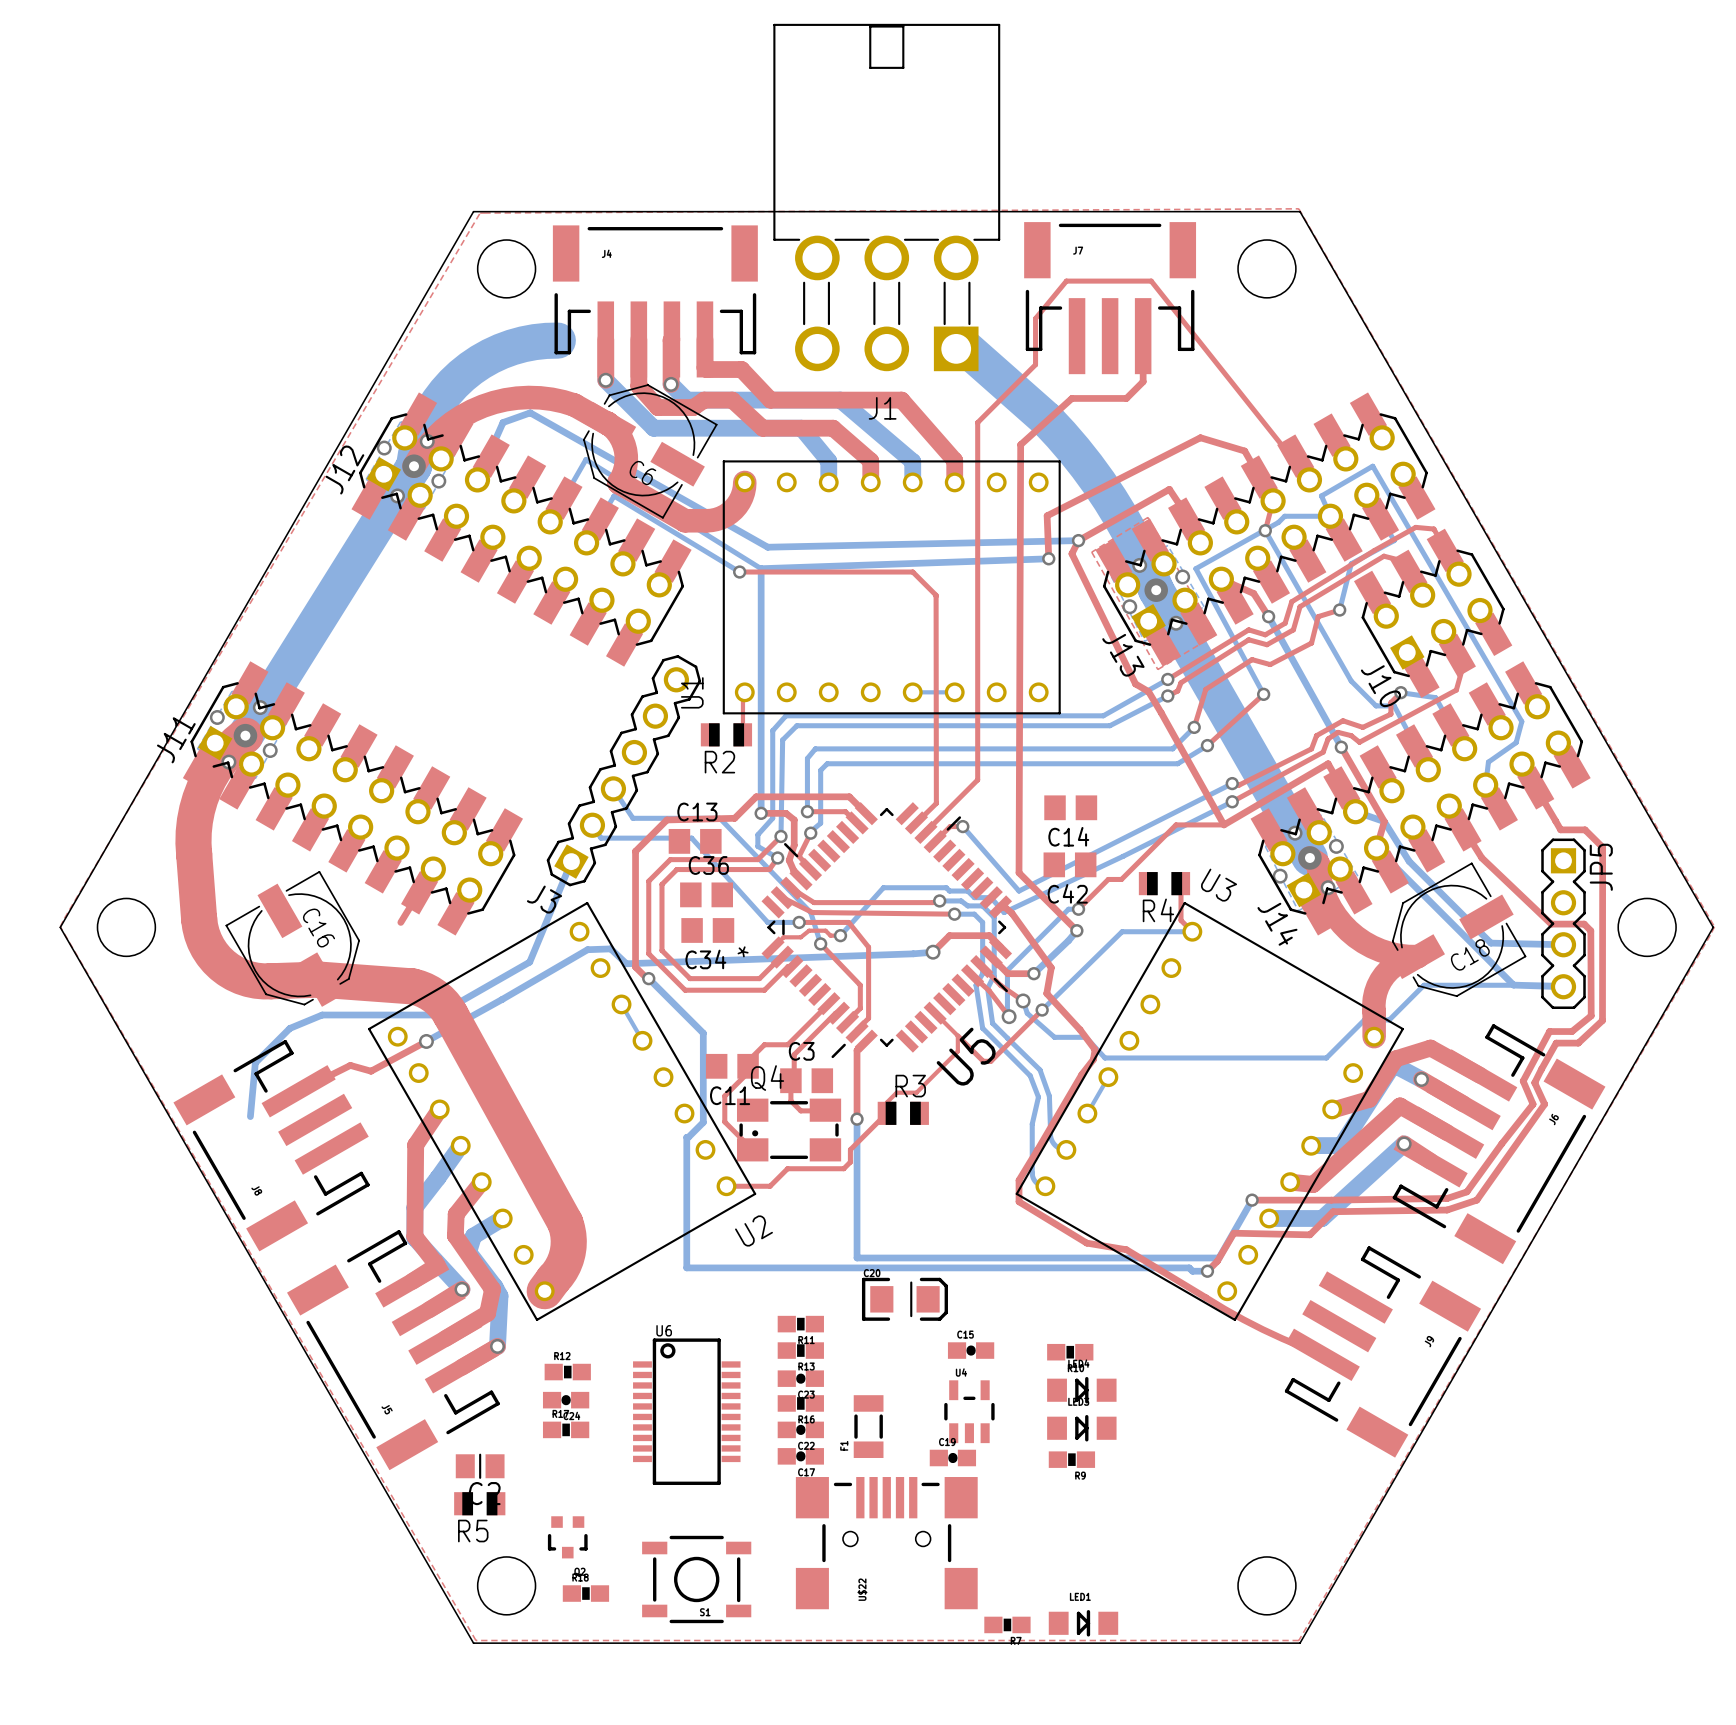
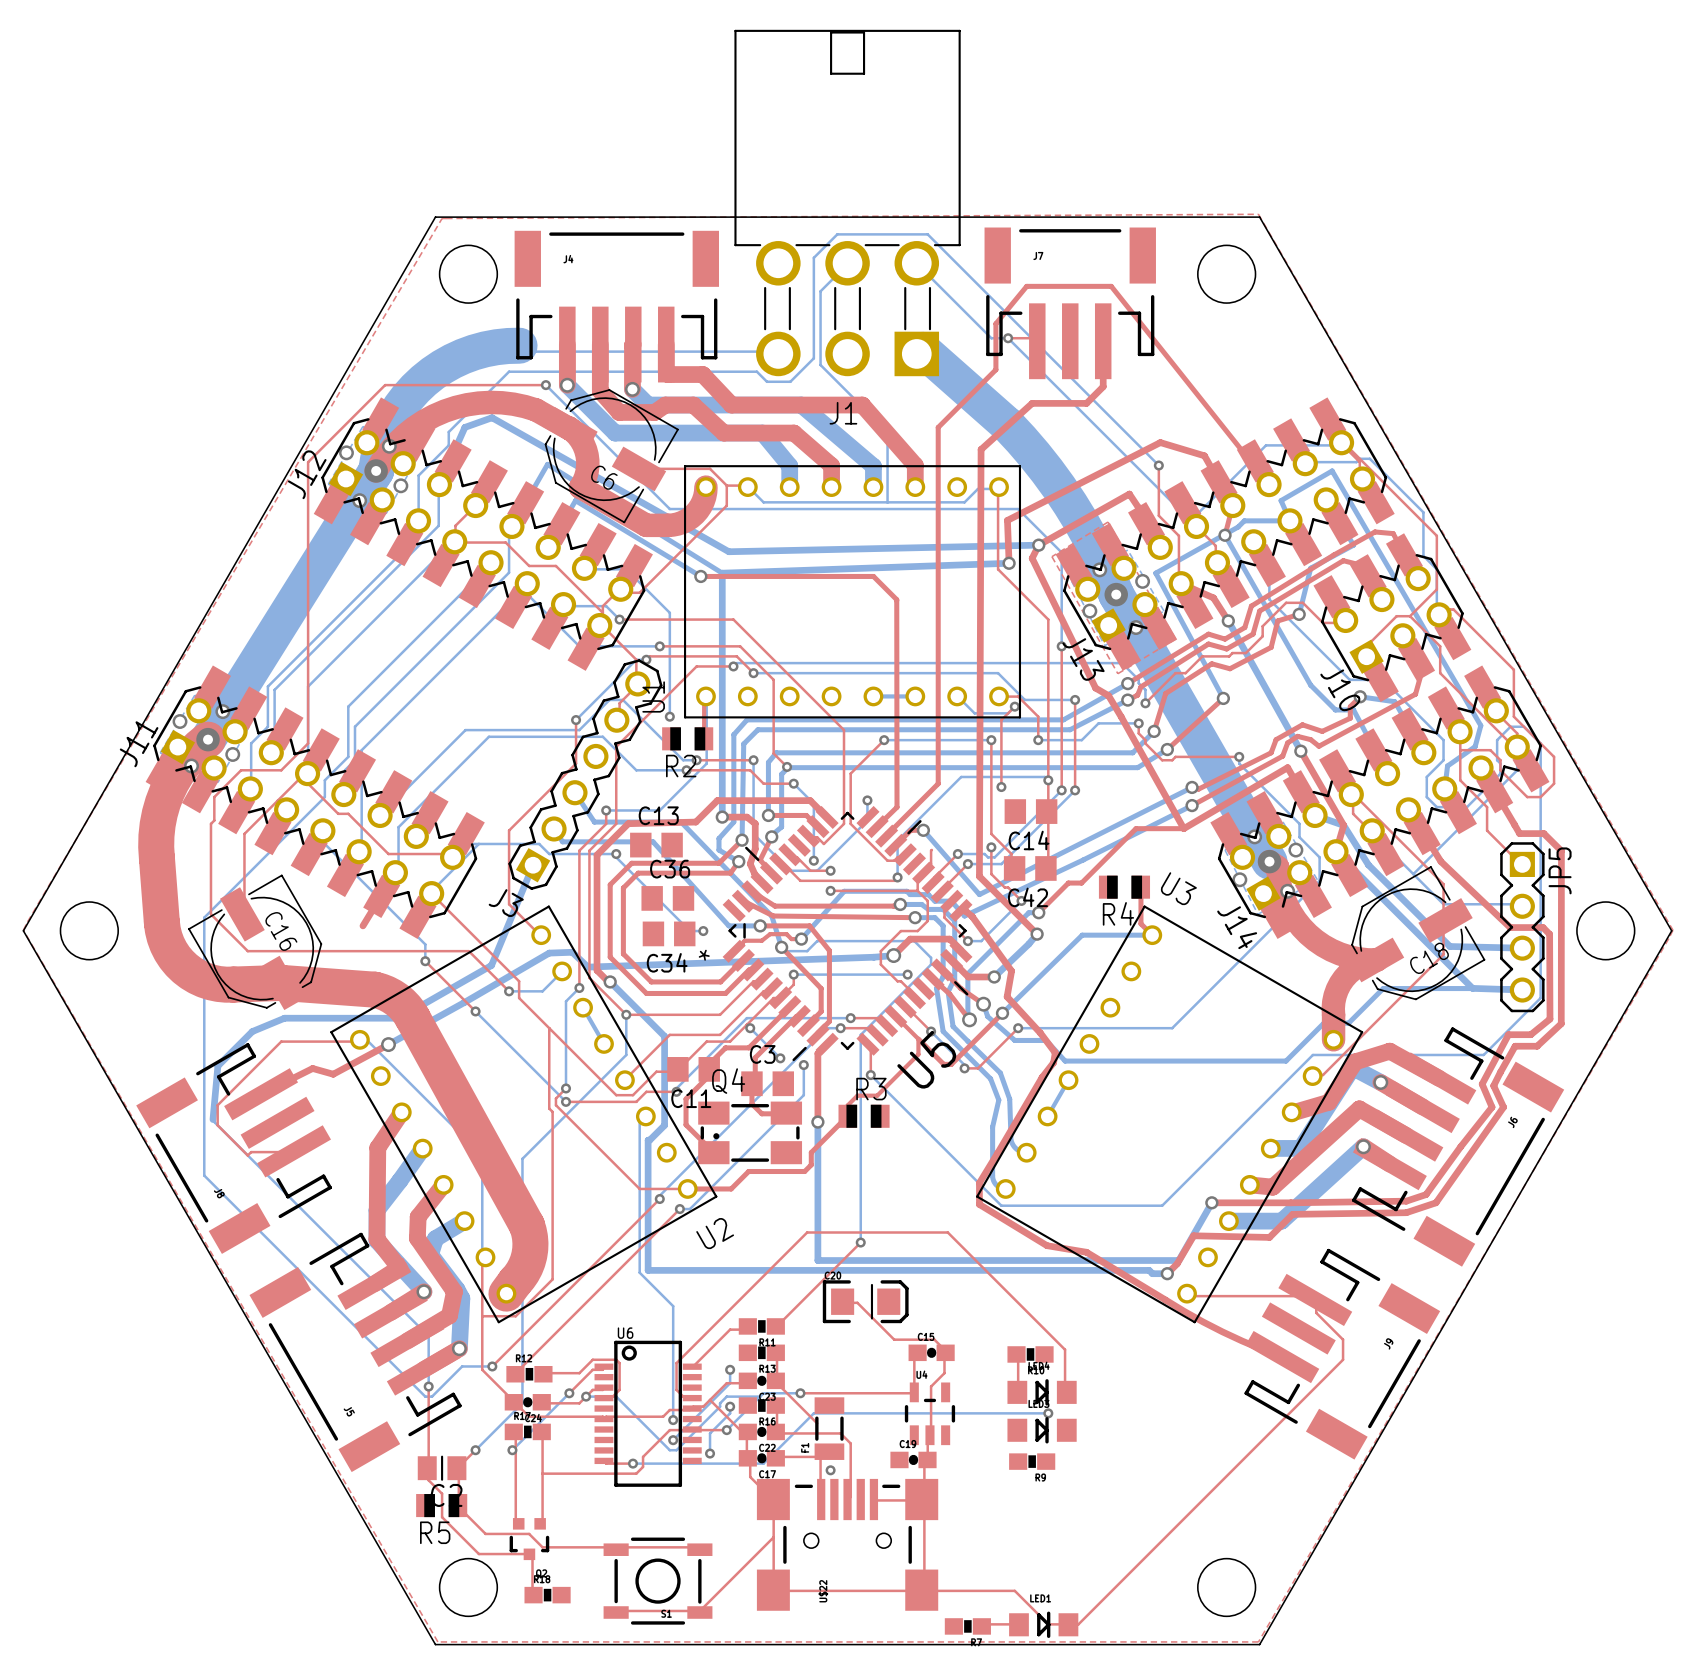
bottom track: none -> (847, 263) (820, 291) (820, 365) (887, 432) (887, 502)
bottom track: none -> (916, 263) (991, 338) (1008, 338) (1182, 512) (1199, 512)
top track: none -> (1008, 338) (1034, 338) (1037, 341)
via: none -> (1008, 338)
bottom track: none -> (519, 345) (535, 351) (777, 351) (778, 353)
bottom track: none -> (545, 385) (669, 509) (1018, 509) (1061, 552) (1061, 646)
top track: none -> (545, 385) (385, 385) (308, 462) (308, 743) (281, 770) (241, 770) (214, 797) (214, 820) (210, 823) (210, 914) (247, 951) (468, 951) (509, 991)
via: none -> (545, 385)
bottom track: none -> (1341, 442) (1339, 445) (1266, 445) (1199, 512)
bottom track: none -> (1305, 463) (1356, 462) (1359, 458) (1369, 458) (1423, 512) (1423, 555) (1436, 569) (1436, 612) (1439, 614)
bottom track: none -> (1158, 465) (927, 234) (837, 234) (813, 257) (813, 358) (790, 381) (766, 381) (756, 371) (509, 371) (448, 432) (448, 445) (418, 475) (418, 519) (415, 522) (415, 539) (267, 686) (267, 726) (251, 743) (250, 788)
top track: none -> (1158, 465) (1158, 515) (1178, 535) (1178, 582) (1181, 583)
via: none -> (1158, 465)
top track: none -> (638, 468) (710, 468) (726, 485)
top track: none -> (1362, 478) (1359, 478) (1359, 462) (1341, 442) (1343, 442) (1436, 535) (1436, 589) (1410, 616)
bottom track: none -> (439, 484) (438, 525) (274, 689) (274, 750) (271, 752)
top track: none -> (726, 485) (747, 487)
top track: none -> (726, 485) (726, 505) (639, 592) (616, 592) (619, 589) (602, 606) (602, 622) (599, 625)
bottom track: none -> (747, 487) (763, 502) (964, 502) (977, 488) (998, 488) (999, 487)
top track: none -> (999, 487) (998, 569) (1048, 619) (1048, 810) (1046, 811) (1048, 813) (1048, 867) (1045, 868)
top track: none -> (475, 505) (455, 525) (455, 542) (505, 542) (529, 565) (555, 565) (602, 612) (599, 625)
bottom track: none -> (511, 526) (509, 529) (509, 572) (354, 726) (354, 760) (344, 770) (343, 794)
top track: none -> (1196, 526) (1215, 545) (1215, 562) (1217, 562)
bottom track: none -> (454, 541) (308, 686) (307, 773)
bottom track: none -> (1253, 541) (1269, 555) (1269, 599) (1349, 679) (1383, 679) (1443, 740) (1443, 760) (1426, 776) (1426, 797) (1436, 807) (1466, 807) (1500, 773) (1500, 763) (1497, 760) (1497, 740) (1510, 726) (1523, 726) (1540, 743) (1540, 998) (1483, 1054) (1312, 1054) (1162, 1205) (1001, 1205) (870, 1075)
bottom track: none -> (491, 562) (348, 706) (348, 756) (324, 780) (324, 797) (204, 917) (204, 1175) (425, 1396) (432, 1396) (462, 1366) (492, 1366)
bottom track: none -> (584, 568) (626, 569) (669, 612) (669, 716)
bottom track: none -> (563, 604) (606, 606) (619, 619)
top track: none -> (1439, 614) (1440, 612) (1446, 612) (1453, 609) (1513, 669) (1513, 716) (1554, 756) (1554, 783) (1540, 797) (1527, 797) (1500, 770) (1500, 760) (1490, 750) (1460, 750)
top track: none -> (1410, 616) (1396, 616) (1369, 643) (1369, 656) (1366, 656)
top track: none -> (1410, 616) (1440, 646) (1440, 673) (1517, 750) (1517, 747)
top track: none -> (619, 619) (733, 619) (844, 730) (844, 823) (823, 843) (817, 837) (808, 836)
via: none -> (619, 619)
top track: none -> (1345, 620) (1343, 622) (1322, 622) (1302, 602) (1286, 602) (1262, 626) (1262, 636) (1245, 653) (1232, 653) (1229, 656) (1202, 656) (1185, 673) (1175, 673) (1145, 703)
top track: none -> (599, 625) (602, 626) (636, 659) (637, 683) (619, 703) (619, 720) (616, 720)
bottom track: none -> (659, 646) (579, 646) (522, 589) (527, 583) (361, 750) (361, 850) (359, 851)
top track: none -> (659, 646) (740, 646) (773, 679) (773, 753) (787, 766)
via: none -> (659, 646)
top track: none -> (1061, 646) (1061, 790)
via: none -> (1061, 646)
bottom track: none -> (646, 659) (636, 659) (576, 720)
top track: none -> (646, 659) (649, 656) (736, 656) (753, 673)
via: none -> (646, 659)
bottom track: none -> (733, 666) (736, 663) (1122, 663) (1138, 679) (1138, 683) (1145, 689) (1145, 703)
top track: none -> (733, 666) (696, 666) (616, 746) (616, 823) (589, 850) (589, 977) (626, 1014) (720, 1014) (753, 981) (760, 981) (762, 979)
via: none -> (733, 666)
bottom track: none -> (753, 673) (998, 673) (1024, 699) (1075, 699)
via: none -> (753, 673)
bottom track: none -> (705, 696) (706, 763) (659, 810) (606, 810)
bottom track: none -> (957, 696) (974, 713) (1008, 713) (1014, 706)
top track: none -> (999, 696) (1018, 696) (1038, 716) (1038, 740)
top track: none -> (1075, 699) (1075, 790)
via: none -> (1075, 699)
via: none -> (1145, 703)
top track: none -> (1014, 706) (1001, 720) (1001, 787)
via: none -> (1014, 706)
top track: none -> (1496, 710) (1517, 733) (1517, 746)
via: none -> (669, 716)
top track: none -> (576, 720) (576, 763) (509, 830) (509, 904) (541, 935)
via: none -> (576, 720)
bottom track: none -> (1138, 723) (1098, 723) (1081, 740) (1038, 740)
top track: none -> (1138, 723) (1138, 733) (1145, 740) (1145, 743) (1162, 760) (1172, 760) (1175, 756) (1239, 756)
via: none -> (1138, 723)
top track: none -> (1460, 731) (1460, 780) (1487, 807) (1487, 830) (1522, 864)
bottom track: none -> (884, 740) (991, 740)
top track: none -> (884, 740) (850, 773) (850, 823) (887, 860) (904, 857) (905, 854)
via: none -> (884, 740)
top track: none -> (991, 740) (991, 833) (1011, 854) (1011, 867) (1014, 868)
via: none -> (991, 740)
via: none -> (1038, 740)
bottom track: none -> (1517, 747) (1517, 770) (1413, 874)
bottom track: none -> (1239, 756) (1239, 763) (1299, 823) (1299, 837) (1319, 857) (1319, 880) (1172, 1028) (1018, 1028)
via: none -> (1239, 756)
bottom track: none -> (696, 760) (683, 760) (622, 699) (609, 699) (579, 730) (465, 730) (380, 815)
top track: none -> (696, 760) (753, 760)
via: none -> (696, 760)
bottom track: none -> (753, 760) (753, 833) (790, 870) (817, 870) (867, 820) (867, 800)
via: none -> (753, 760)
via: none -> (787, 766)
bottom track: none -> (686, 770) (636, 770) (602, 736) (488, 736) (398, 827) (398, 870) (395, 872)
top track: none -> (686, 770) (750, 770) (763, 783) (793, 783)
via: none -> (686, 770)
bottom track: none -> (1048, 780) (1044, 776) (961, 776) (897, 840) (897, 877)
via: none -> (1048, 780)
bottom track: none -> (793, 783) (813, 803) (813, 860)
via: none -> (793, 783)
via: none -> (1001, 787)
bottom track: none -> (1061, 790) (994, 857) (988, 857) (984, 854) (957, 854)
via: none -> (1061, 790)
bottom track: none -> (1075, 790) (1001, 864) (967, 864)
via: none -> (1075, 790)
via: none -> (867, 800)
top track: none -> (606, 810) (606, 823) (579, 850) (579, 988)
via: none -> (606, 810)
bottom track: none -> (322, 830) (324, 843) (425, 944) (425, 961)
bottom track: none -> (1372, 830) (1443, 904) (1520, 904) (1522, 906)
top track: none -> (1372, 830) (1353, 813) (1353, 797) (1351, 794) (1353, 793) (1443, 884) (1443, 917) (1445, 920) (1443, 921) (1443, 954) (1322, 1075) (1312, 1076)
bottom track: none -> (478, 843) (432, 890) (431, 893)
top track: none -> (991, 847) (991, 874) (1021, 900)
via: none -> (991, 847)
top track: none -> (931, 849) (931, 864) (917, 877) (917, 890)
bottom track: none -> (612, 854) (689, 931) (703, 931)
bottom track: none -> (616, 854) (549, 854) (539, 843) (465, 843) (452, 857)
via: none -> (616, 854)
top track: none -> (957, 854) (934, 877) (933, 882)
via: none -> (957, 854)
top track: none -> (789, 854) (790, 857) (797, 857) (810, 870) (830, 870)
top track: none -> (452, 857) (452, 854) (388, 854) (348, 813) (338, 813) (301, 776) (307, 773) (304, 773) (244, 833) (244, 914) (242, 914)
via: none -> (813, 860)
top track: none -> (780, 863) (783, 864) (800, 880) (897, 880) (897, 877)
top track: none -> (967, 864) (942, 891)
via: none -> (967, 864)
via: none -> (830, 870)
via: none -> (897, 877)
top track: none -> (830, 890) (917, 890)
via: none -> (830, 890)
top track: none -> (917, 890) (927, 900) (927, 921) (917, 931) (900, 931) (880, 951) (880, 964) (897, 981) (900, 981) (914, 994) (914, 997)
top track: none -> (431, 893) (519, 981) (519, 998) (616, 1095) (632, 1095) (656, 1071) (676, 1071) (706, 1041) (730, 1041) (773, 998) (780, 998) (793, 984) (793, 974)
top track: none -> (951, 901) (944, 910) (944, 917) (967, 941)
bottom track: none -> (1021, 900) (981, 941) (967, 941)
via: none -> (1021, 900)
via: none -> (703, 931)
via: none -> (967, 941)
bottom track: none -> (781, 947) (787, 951) (807, 951) (817, 941) (914, 941) (931, 957) (931, 964) (860, 1034) (860, 1242)
top track: none -> (425, 961) (475, 1011)
via: none -> (425, 961)
bottom track: none -> (562, 971) (542, 991) (509, 991)
bottom track: none -> (793, 974) (907, 974)
via: none -> (793, 974)
via: none -> (907, 974)
bottom track: none -> (579, 988) (566, 1001) (566, 1088)
via: none -> (579, 988)
top track: none -> (771, 988) (770, 991) (763, 991) (720, 1034) (669, 1034) (624, 1080)
via: none -> (509, 991)
top track: none -> (905, 1006) (931, 1031)
bottom track: none -> (475, 1011) (566, 1101)
via: none -> (475, 1011)
bottom track: none -> (626, 1014) (626, 1054) (522, 1158) (522, 1403) (475, 1450)
via: none -> (626, 1014)
bottom track: none -> (850, 1018) (746, 1018) (676, 1088) (676, 1091)
top track: none -> (850, 1018) (877, 1018) (886, 1025)
via: none -> (850, 1018)
top track: none -> (549, 1028) (549, 1108) (552, 1111) (552, 1279) (515, 1316) (482, 1316)
bottom track: none -> (750, 1028) (780, 1058)
via: none -> (750, 1028)
bottom track: none -> (840, 1028) (827, 1028) (659, 1195) (659, 1199)
top track: none -> (840, 1028) (867, 1028) (874, 1034) (877, 1035)
via: none -> (840, 1028)
top track: none -> (1018, 1028) (977, 1068) (964, 1068)
via: none -> (1018, 1028)
bottom track: none -> (931, 1031) (964, 1065) (964, 1068)
via: none -> (931, 1031)
bottom track: none -> (359, 1039) (368, 1041) (482, 1155) (482, 1255) (485, 1257)
top track: none -> (359, 1039) (358, 1041) (281, 1041) (217, 1105) (217, 1125) (247, 1155) (251, 1152) (294, 1151)
top track: none -> (867, 1044) (870, 1044) (870, 1075)
via: none -> (780, 1058)
bottom track: none -> (803, 1065) (803, 1095) (689, 1209) (679, 1209)
via: none -> (803, 1065)
via: none -> (964, 1068)
via: none -> (870, 1075)
top track: none -> (566, 1088) (555, 1098) (555, 1105) (639, 1188) (687, 1188)
via: none -> (566, 1088)
top track: none -> (676, 1091) (646, 1091) (636, 1101) (566, 1101)
via: none -> (676, 1091)
via: none -> (566, 1101)
bottom track: none -> (645, 1116) (639, 1121) (639, 1272) (673, 1306) (673, 1420)
bottom track: none -> (212, 1119) (428, 1336) (428, 1386)
top track: none -> (659, 1199) (492, 1366)
via: none -> (659, 1199)
top track: none -> (679, 1209) (515, 1374)
via: none -> (679, 1209)
top track: none -> (860, 1242) (775, 1326)
via: none -> (860, 1242)
top track: none -> (485, 1257) (482, 1259) (482, 1369) (529, 1416) (602, 1416) (603, 1419) (606, 1416) (663, 1416) (669, 1410) (689, 1410) (693, 1406) (703, 1406) (726, 1383) (746, 1383) (747, 1380)
top track: none -> (1187, 1293) (1188, 1296) (1309, 1296) (1315, 1299) (1316, 1312) (1343, 1339) (1343, 1359) (1078, 1624) (1048, 1624) (1014, 1590) (921, 1590)
top track: none -> (842, 1301) (857, 1302) (894, 1339) (934, 1339) (944, 1349) (944, 1373) (931, 1386) (931, 1433) (927, 1436) (927, 1459) (924, 1460) (924, 1497) (921, 1499)
top track: none -> (747, 1326) (746, 1329) (730, 1329) (692, 1366)
top track: none -> (775, 1352) (777, 1383) (817, 1423)
top track: none -> (917, 1352) (914, 1353) (914, 1392) (800, 1393)
top track: none -> (1016, 1354) (1018, 1356) (1017, 1392)
via: none -> (492, 1366)
top track: none -> (603, 1366) (602, 1369) (592, 1369) (569, 1393)
bottom track: none -> (730, 1369) (730, 1383) (673, 1440)
via: none -> (730, 1369)
top track: none -> (543, 1374) (579, 1373) (592, 1359) (616, 1359) (619, 1363) (619, 1389) (612, 1396) (603, 1398)
top track: none -> (428, 1386) (427, 1468) (428, 1480) (442, 1493) (442, 1517) (478, 1554) (529, 1554) (532, 1557) (533, 1595)
via: none -> (428, 1386)
top track: none -> (603, 1387) (602, 1389) (592, 1389) (579, 1403) (541, 1402)
top track: none -> (1066, 1392) (1065, 1389) (1065, 1349) (947, 1232) (807, 1232) (676, 1363) (676, 1389) (683, 1396) (692, 1398)
bottom track: none -> (569, 1393) (512, 1450)
via: none -> (569, 1393)
bottom track: none -> (800, 1393) (763, 1393) (726, 1430)
via: none -> (800, 1393)
bottom track: none -> (586, 1396) (616, 1396) (669, 1450) (676, 1450) (720, 1406) (720, 1403) (726, 1396) (760, 1396)
via: none -> (586, 1396)
top track: none -> (710, 1399) (746, 1436) (747, 1431) (746, 1456) (750, 1460) (750, 1477) (773, 1499) (773, 1590) (921, 1590)
top track: none -> (775, 1405) (777, 1433) (840, 1433) (850, 1443) (850, 1497) (847, 1499)
bottom track: none -> (730, 1406) (730, 1413) (710, 1433) (710, 1453)
via: none -> (730, 1406)
bottom track: none -> (1048, 1413) (813, 1413) (763, 1463) (632, 1463)
via: none -> (1048, 1413)
via: none -> (673, 1420)
top track: none -> (726, 1430) (669, 1430) (643, 1456) (643, 1466) (636, 1473) (542, 1473)
via: none -> (726, 1430)
top track: none -> (513, 1431) (515, 1433) (515, 1520) (518, 1523)
top track: none -> (541, 1431) (542, 1520) (540, 1523)
via: none -> (673, 1440)
top track: none -> (475, 1450) (456, 1468) (458, 1470) (458, 1505) (485, 1533) (529, 1533) (542, 1547) (612, 1547) (616, 1549) (616, 1547) (696, 1547) (699, 1549)
via: none -> (475, 1450)
via: none -> (512, 1450)
via: none -> (710, 1453)
top track: none -> (775, 1458) (777, 1456) (823, 1456) (829, 1451) (820, 1456) (820, 1497) (821, 1499)
top track: none -> (603, 1460) (606, 1463) (632, 1463)
via: none -> (632, 1463)
via: none -> (830, 1470)
top track: none -> (873, 1499) (921, 1499)
top track: none -> (921, 1499) (924, 1500) (924, 1587) (921, 1590)
top track: none -> (773, 1537) (699, 1612) (696, 1610) (616, 1610) (616, 1612)
top track: none -> (1018, 1624) (984, 1624) (981, 1626)

